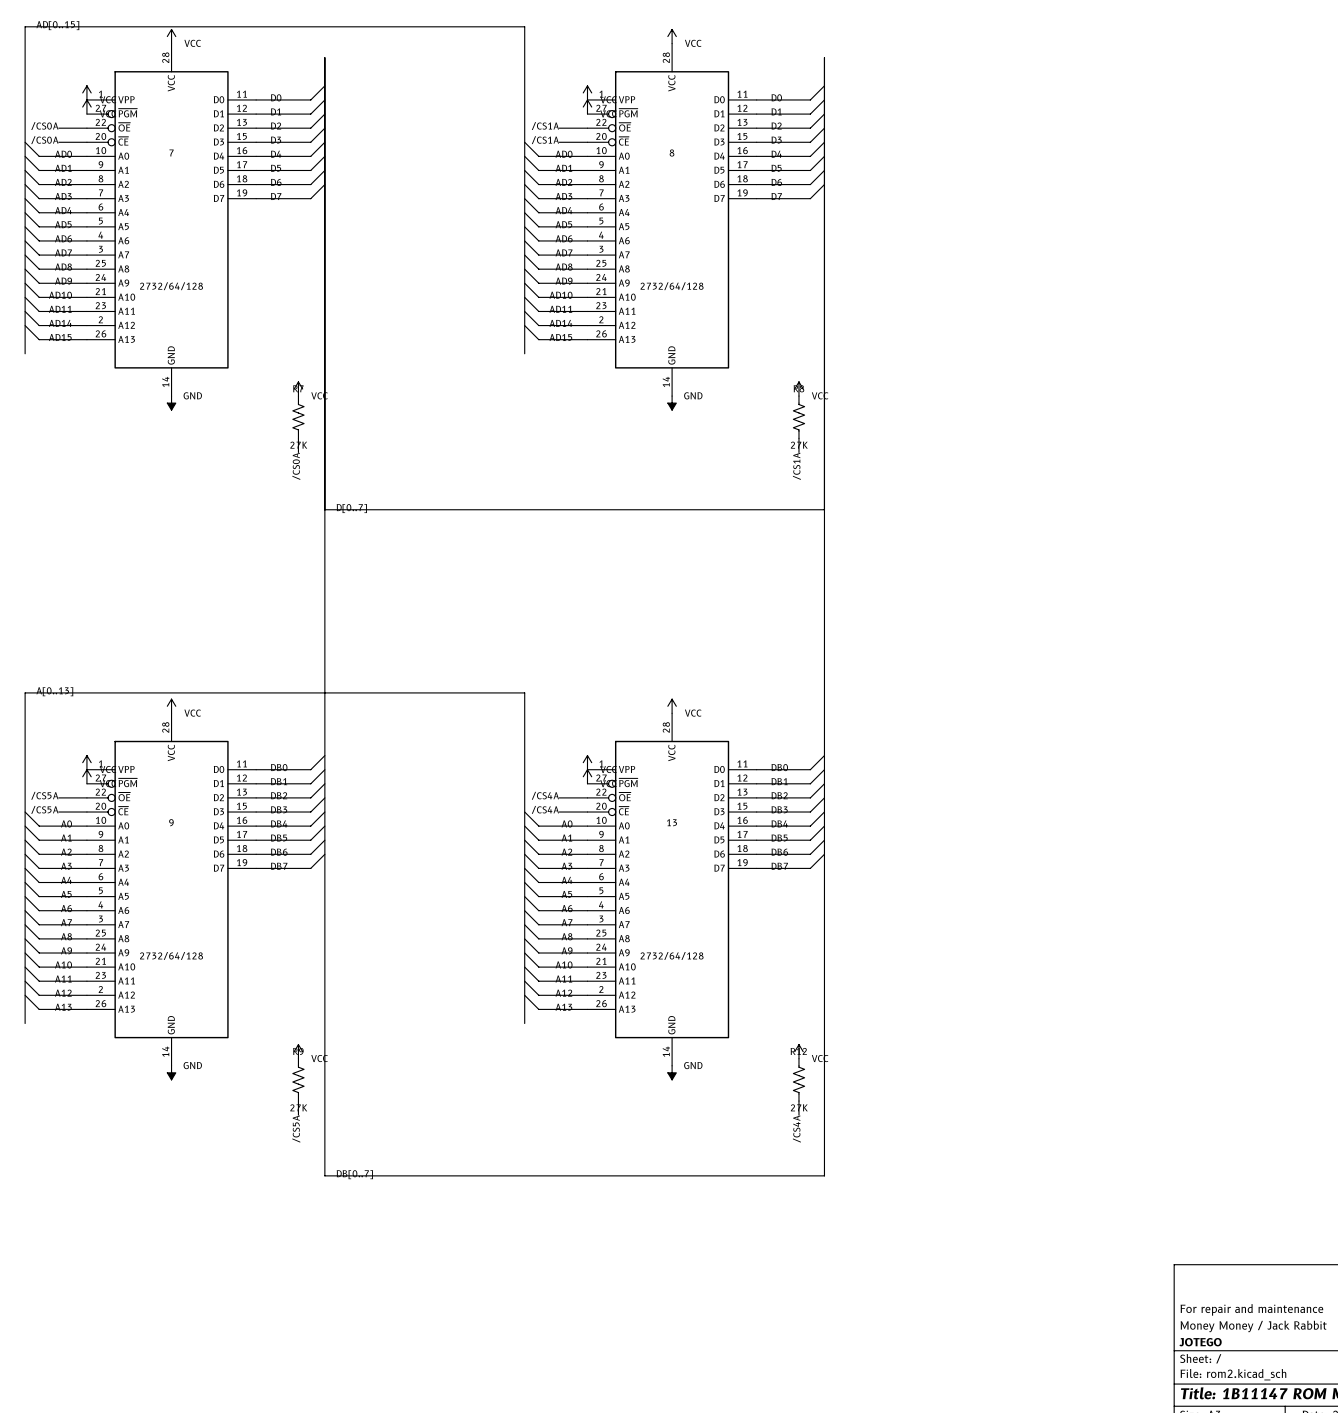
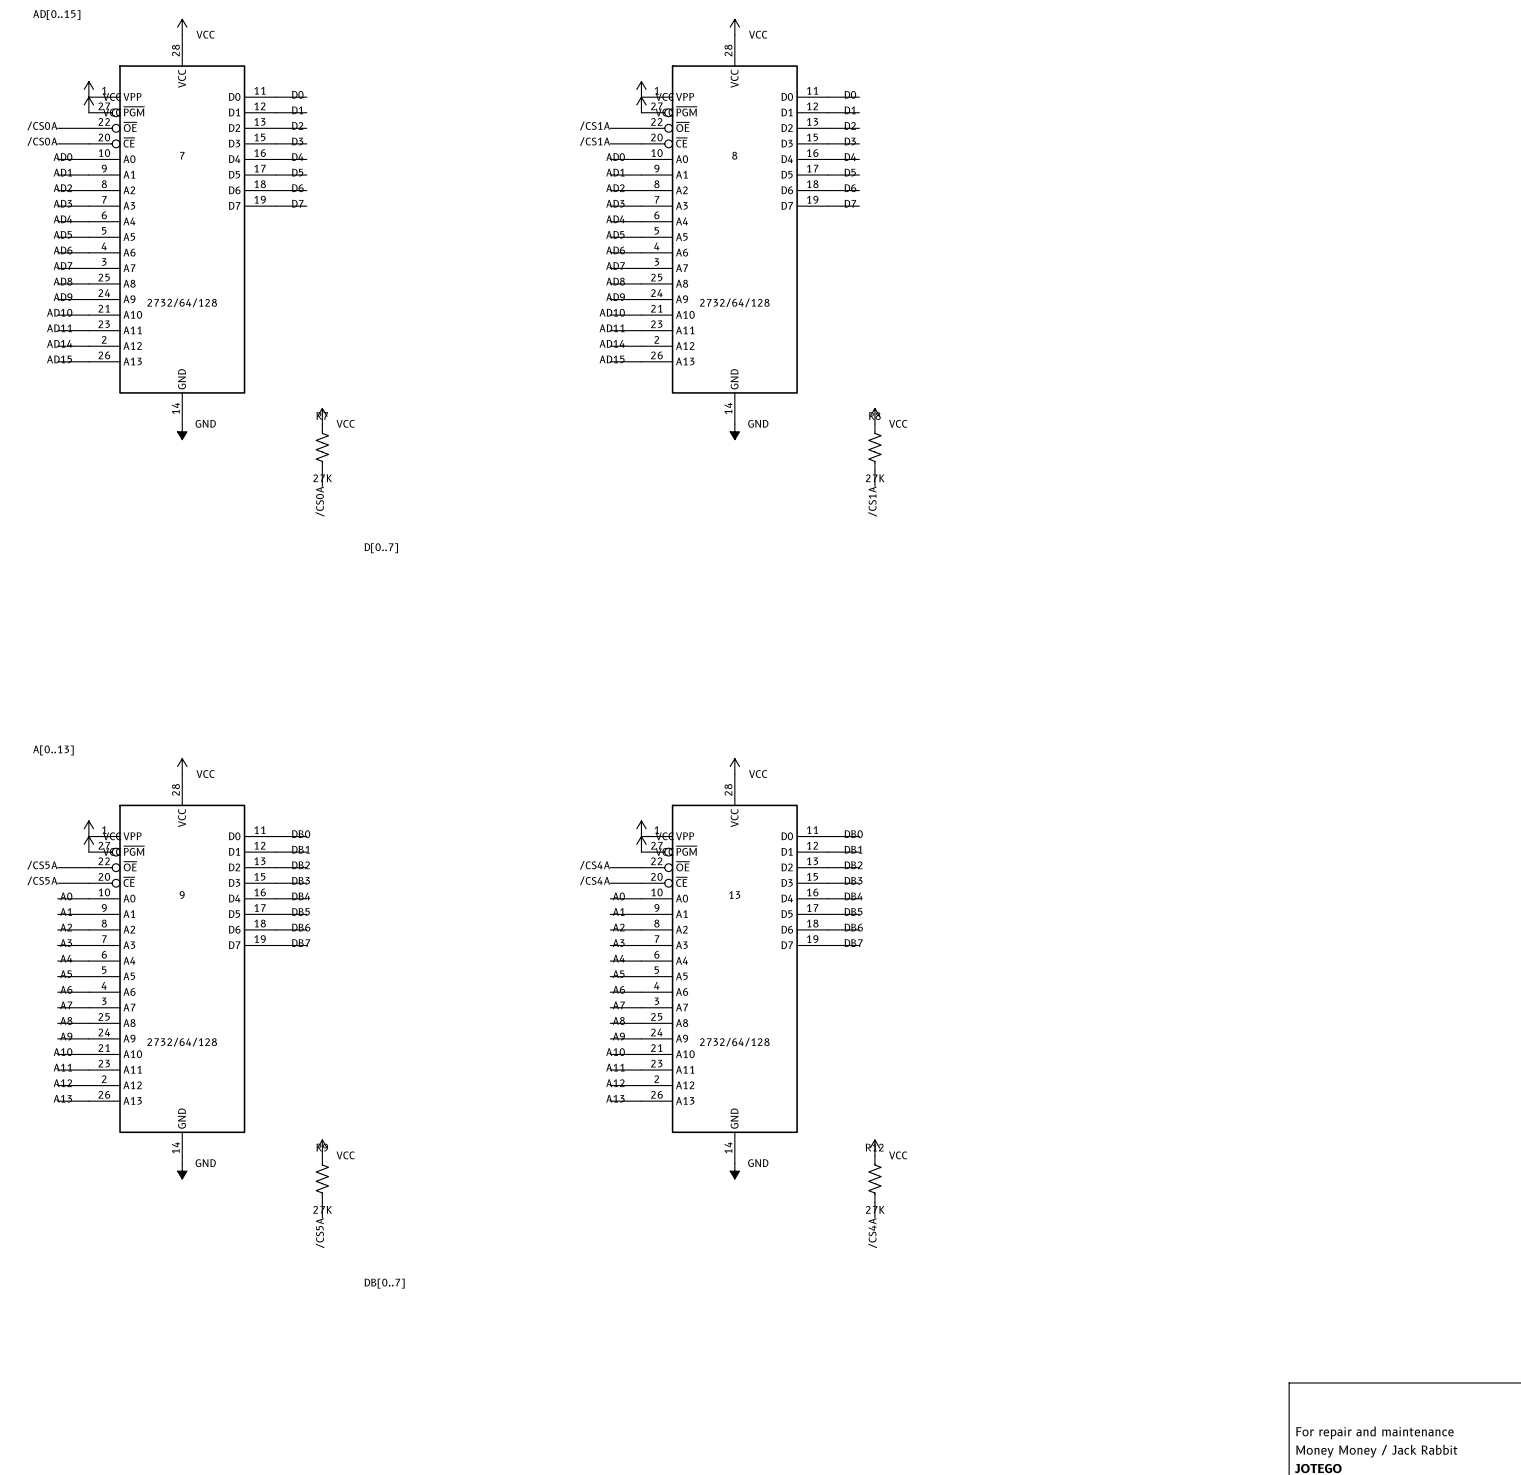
bus: (324, 57) (324, 1175) (824, 1175) (824, 57) -> none
wire: (324, 85) (310, 99) (284, 99) -> none
wire: (824, 85) (810, 99) (784, 99) -> none
wire: (324, 99) (310, 114) (284, 114) -> none
wire: (824, 99) (810, 114) (784, 114) -> none
wire: (324, 114) (310, 128) (284, 128) -> none
wire: (824, 114) (810, 128) (784, 128) -> none
wire: (324, 128) (310, 142) (284, 142) -> none
wire: (824, 128) (810, 142) (784, 142) -> none
wire: (25, 142) (39, 156) (58, 156) -> none
wire: (324, 142) (310, 156) (284, 156) -> none
wire: (524, 142) (538, 156) (559, 156) -> none
wire: (824, 142) (810, 156) (784, 156) -> none
wire: (25, 156) (39, 170) (58, 170) -> none
wire: (324, 156) (310, 170) (284, 170) -> none
wire: (524, 156) (538, 170) (559, 170) -> none
wire: (824, 156) (810, 170) (784, 170) -> none
wire: (25, 170) (39, 184) (58, 184) -> none
wire: (324, 170) (310, 184) (284, 184) -> none
wire: (524, 170) (538, 184) (559, 184) -> none
wire: (824, 170) (810, 184) (784, 184) -> none
wire: (25, 184) (39, 198) (58, 198) -> none
wire: (324, 184) (310, 198) (284, 198) -> none
wire: (524, 184) (538, 198) (559, 198) -> none
wire: (824, 184) (810, 198) (784, 198) -> none
wire: (25, 198) (39, 212) (58, 212) -> none
wire: (524, 198) (538, 212) (559, 212) -> none
wire: (25, 212) (39, 226) (58, 226) -> none
wire: (524, 212) (538, 226) (559, 226) -> none
wire: (25, 226) (39, 240) (58, 240) -> none
wire: (524, 226) (538, 240) (559, 240) -> none
wire: (25, 240) (39, 255) (58, 255) -> none
wire: (524, 240) (538, 255) (559, 255) -> none
wire: (25, 255) (39, 269) (58, 269) -> none
wire: (524, 255) (538, 269) (559, 269) -> none
wire: (25, 269) (39, 283) (58, 283) -> none
wire: (524, 269) (538, 283) (559, 283) -> none
wire: (25, 283) (39, 297) (58, 297) -> none
wire: (524, 283) (538, 297) (559, 297) -> none
wire: (25, 297) (39, 311) (58, 311) -> none
wire: (524, 297) (538, 311) (559, 311) -> none
wire: (25, 311) (39, 325) (58, 325) -> none
wire: (524, 311) (538, 325) (559, 325) -> none
wire: (25, 325) (39, 339) (58, 339) -> none
wire: (524, 325) (538, 339) (559, 339) -> none
bus: (25, 353) (25, 26) (524, 26) (524, 353) -> none
bus: (324, 509) (824, 509) -> none
wire: (324, 755) (310, 769) (284, 769) -> none
wire: (824, 755) (810, 769) (784, 769) -> none
wire: (324, 769) (310, 783) (284, 783) -> none
wire: (824, 769) (810, 783) (784, 783) -> none
wire: (324, 783) (310, 797) (284, 797) -> none
wire: (824, 783) (810, 797) (784, 797) -> none
wire: (324, 797) (310, 812) (284, 812) -> none
wire: (824, 797) (810, 812) (784, 812) -> none
wire: (25, 812) (39, 826) (58, 826) -> none
wire: (324, 812) (310, 826) (284, 826) -> none
wire: (524, 812) (538, 826) (559, 826) -> none
wire: (824, 812) (810, 826) (784, 826) -> none
wire: (25, 826) (39, 840) (58, 840) -> none
wire: (324, 826) (310, 840) (284, 840) -> none
wire: (524, 826) (538, 840) (559, 840) -> none
wire: (824, 826) (810, 840) (784, 840) -> none
wire: (25, 840) (39, 854) (58, 854) -> none
wire: (324, 840) (310, 854) (284, 854) -> none
wire: (524, 840) (538, 854) (559, 854) -> none
wire: (824, 840) (810, 854) (784, 854) -> none
wire: (25, 854) (39, 868) (58, 868) -> none
wire: (324, 854) (310, 868) (284, 868) -> none
wire: (524, 854) (538, 868) (559, 868) -> none
wire: (824, 854) (810, 868) (784, 868) -> none
wire: (25, 868) (39, 882) (58, 882) -> none
wire: (524, 868) (538, 882) (559, 882) -> none
wire: (25, 882) (39, 896) (58, 896) -> none
wire: (524, 882) (538, 896) (559, 896) -> none
wire: (25, 896) (39, 910) (58, 910) -> none
wire: (524, 896) (538, 910) (559, 910) -> none
wire: (25, 910) (39, 924) (58, 924) -> none
wire: (524, 910) (538, 924) (559, 924) -> none
wire: (25, 924) (39, 938) (58, 938) -> none
wire: (524, 924) (538, 938) (559, 938) -> none
wire: (25, 938) (39, 953) (58, 953) -> none
wire: (524, 938) (538, 953) (559, 953) -> none
wire: (25, 953) (39, 967) (58, 967) -> none
wire: (524, 953) (538, 967) (559, 967) -> none
wire: (25, 967) (39, 981) (58, 981) -> none
wire: (524, 967) (538, 981) (559, 981) -> none
wire: (25, 981) (39, 995) (58, 995) -> none
wire: (524, 981) (538, 995) (559, 995) -> none
wire: (25, 995) (39, 1009) (58, 1009) -> none
wire: (524, 995) (538, 1009) (559, 1009) -> none
bus: (25, 1023) (25, 692) (524, 692) (524, 1023) -> none

